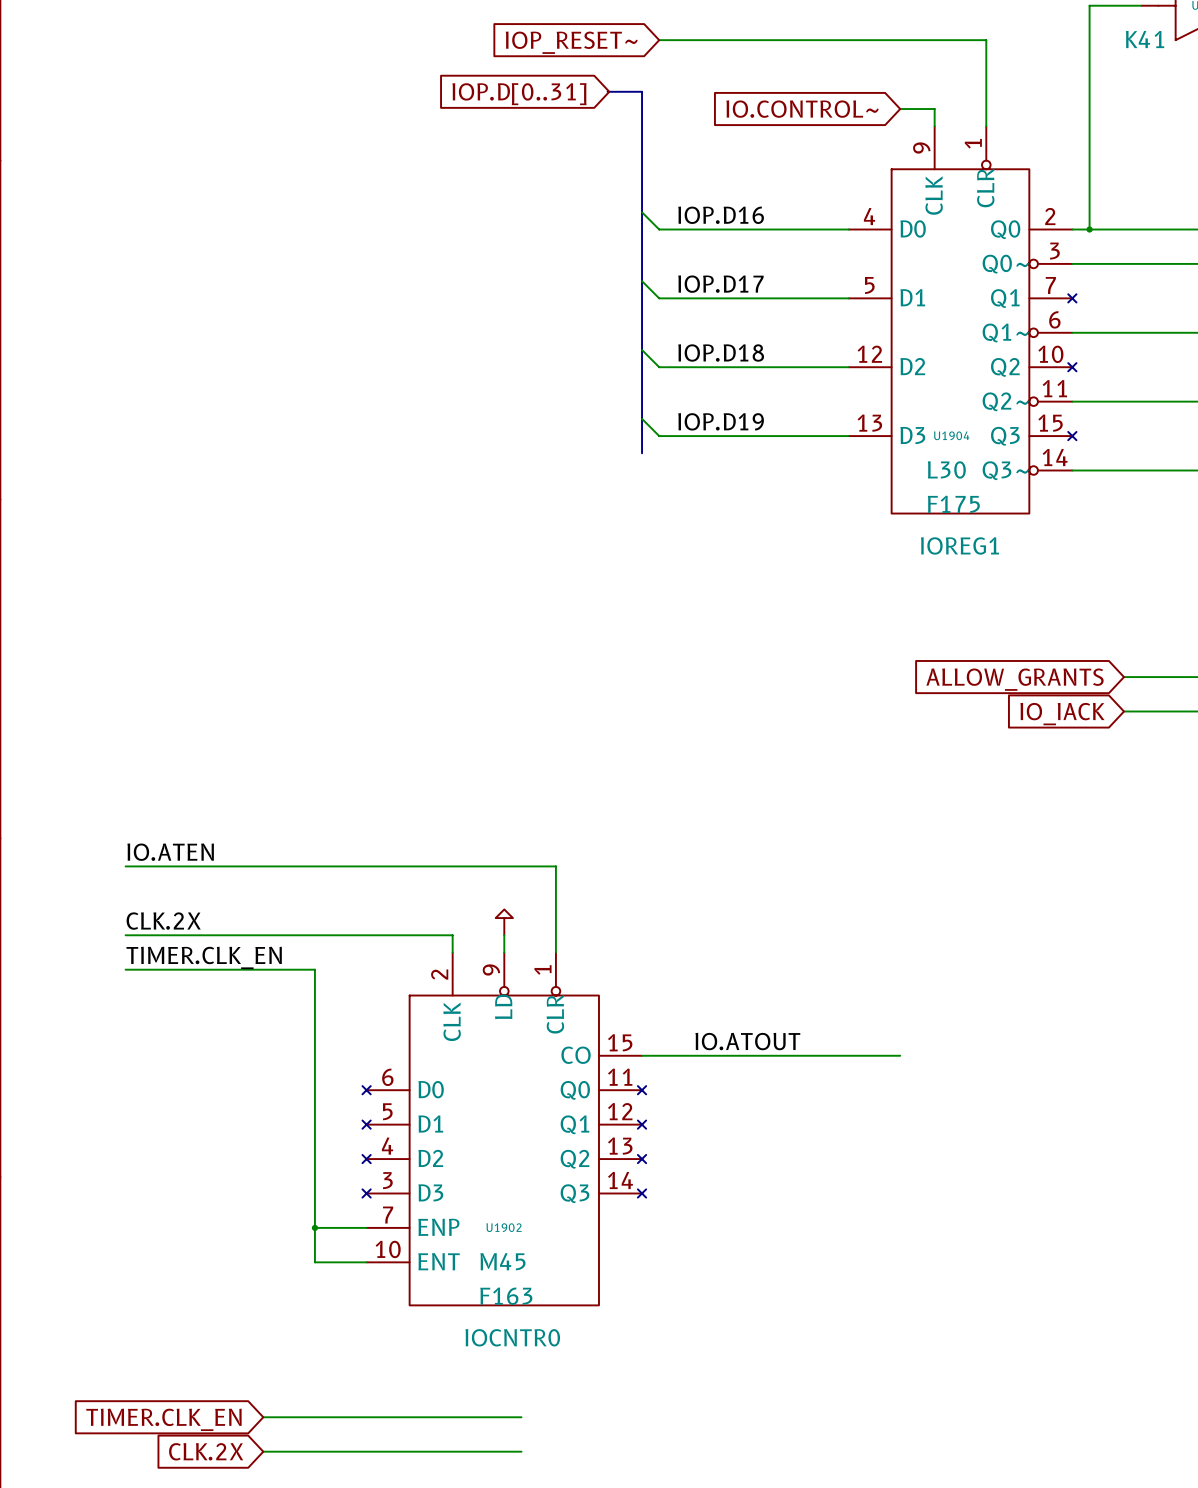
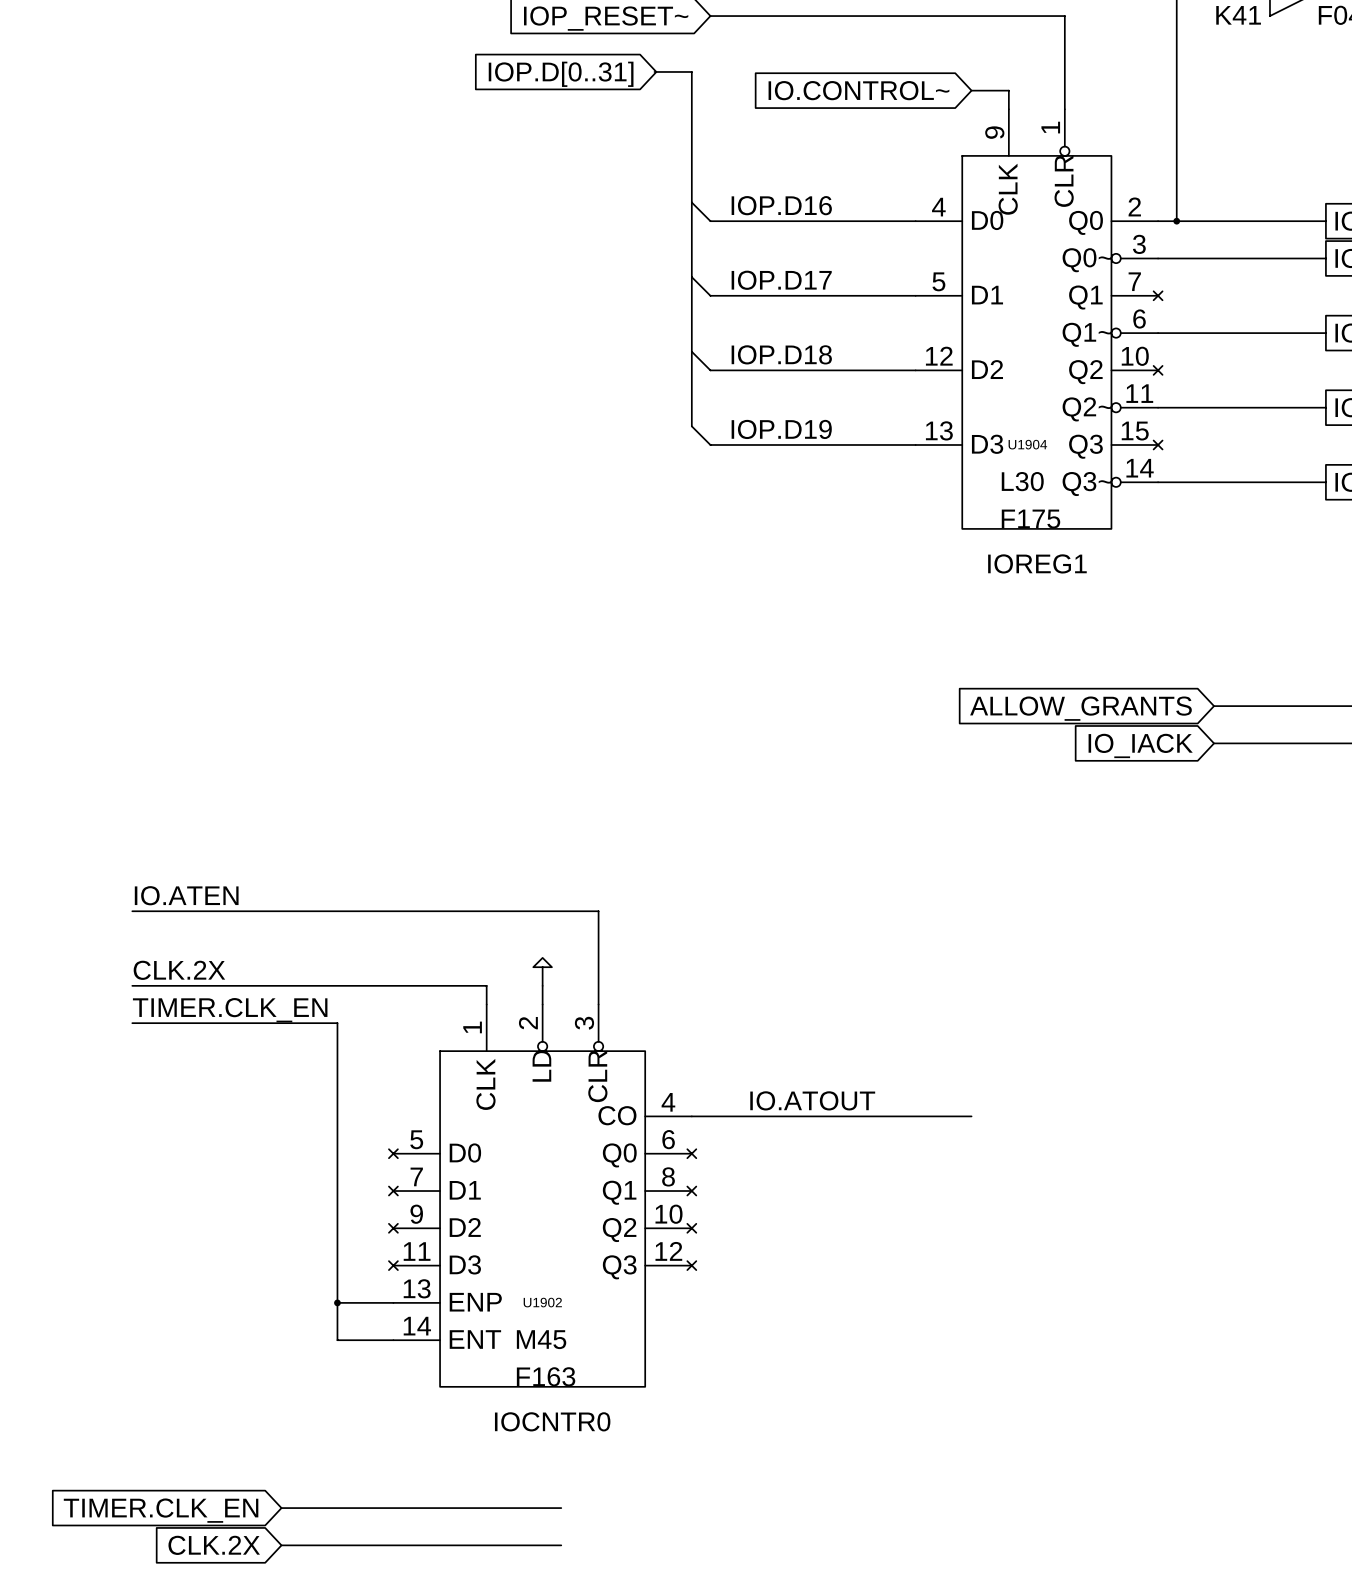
bus: (642, 418) (642, 453) -> none
U1902 symbol: [366, 952, 643, 1306] -> [393, 1004, 692, 1387]

